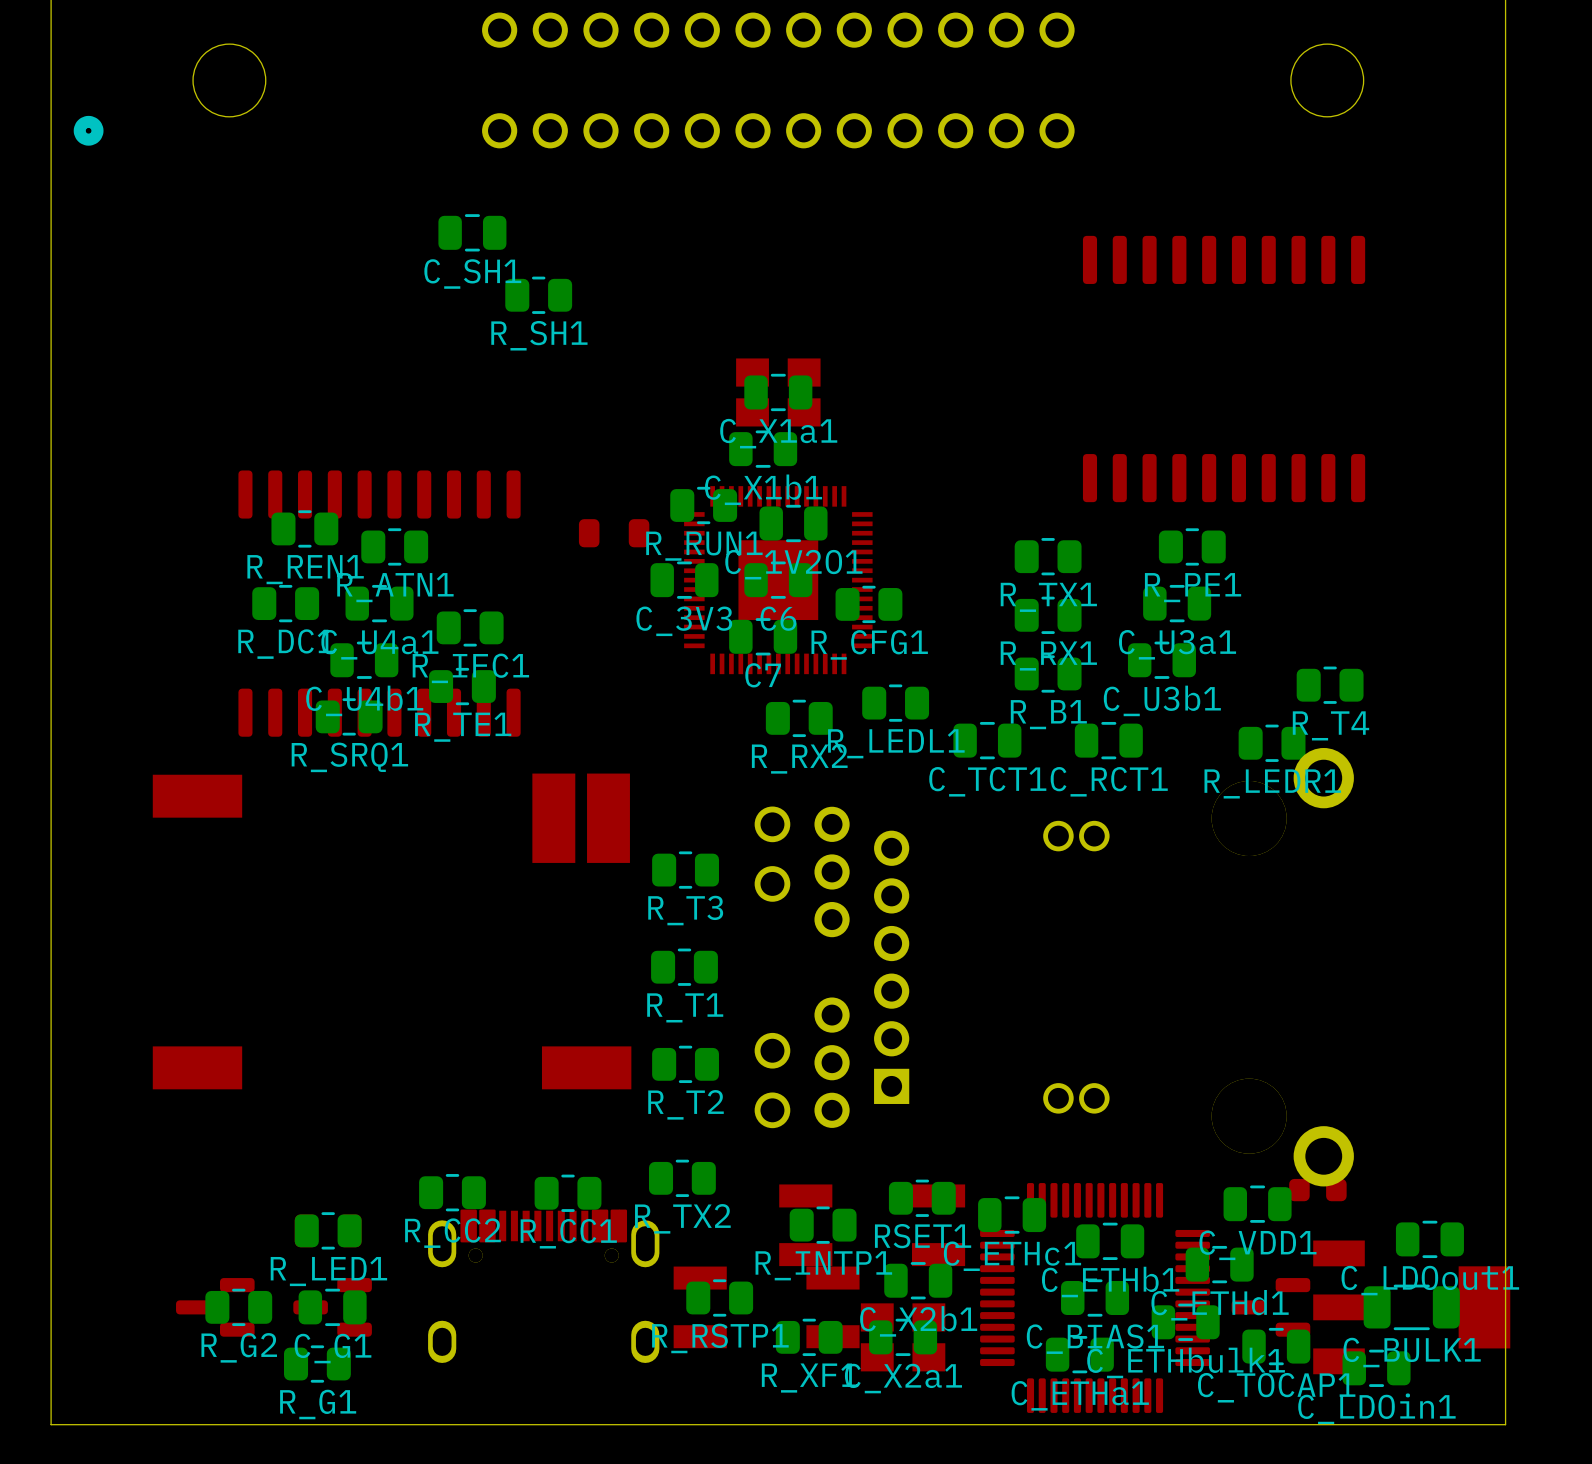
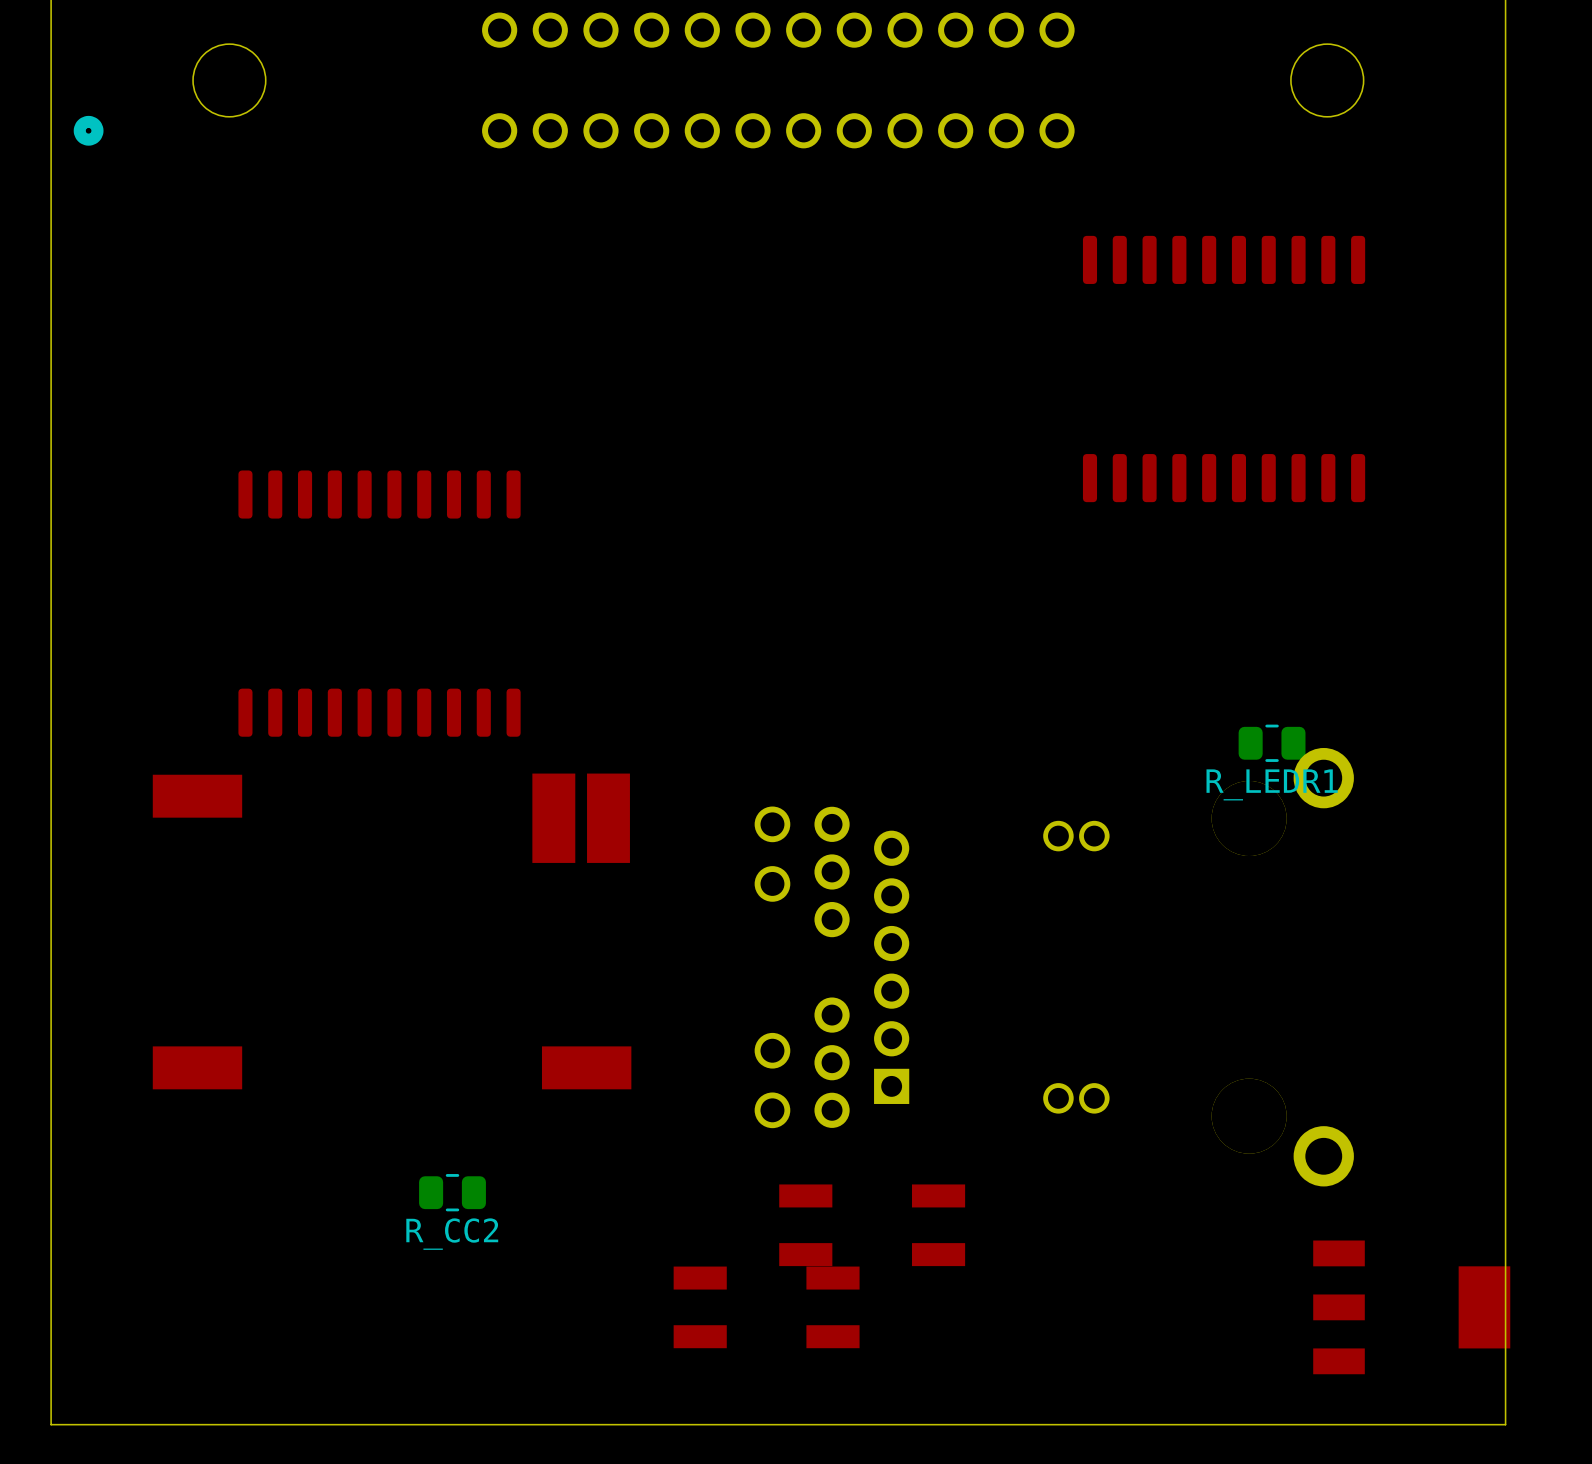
C_SH1: (472, 232) -> none
R_SH1: (538, 295) -> none
part: (778, 392) -> none
C_X1a1: (778, 392) -> none
C_X1b1: (763, 449) -> none
R_RUN1: (703, 505) -> none
C_1V2O1: (793, 523) -> none
R_REN1: (304, 528) -> none
part: (614, 533) -> none
R_ATN1: (394, 546) -> none
R_PE1: (1192, 546) -> none
R_TX1: (1048, 556) -> none
C_3V3: (684, 580) -> none
part: (778, 580) -> none
C6: (778, 580) -> none
R_DC1: (285, 603) -> none
C_U4a1: (379, 603) -> none
C_U3a1: (1177, 603) -> none
R_CFG1: (868, 604) -> none
R_RX1: (1048, 615) -> none
R_IFC1: (470, 627) -> none
C7: (763, 636) -> none
C_U4b1: (364, 660) -> none
C_U3b1: (1161, 660) -> none
R_B1: (1048, 673) -> none
R_T4: (1330, 685) -> none
R_TE1: (462, 686) -> none
R_LEDL1: (895, 703) -> none
R_SRQ1: (349, 716) -> none
R_RX2: (799, 718) -> none
C_TCT1: (987, 740) -> none
C_RCT1: (1108, 740) -> none
R_T3: (685, 870) -> none
R_T1: (684, 967) -> none
R_T2: (685, 1064) -> none
R_TX2: (682, 1178) -> none
part: (1317, 1190) -> none
R_CC1: (568, 1193) -> none
RSET1: (922, 1198) -> none
C_VDD1: (1257, 1204) -> none
C_ETHc1: (1012, 1215) -> none
R_INTP1: (823, 1225) -> none
R_LED1: (328, 1230) -> none
C_LDOout1: (1429, 1239) -> none
C_ETHb1: (1110, 1241) -> none
C_ETHd1: (1219, 1264) -> none
C_X2b1: (918, 1280) -> none
part: (543, 1286) -> none
R_RSTP1: (719, 1297) -> none
part: (1095, 1297) -> none
C_BIAS1: (1095, 1297) -> none
part: (215, 1307) -> none
R_G2: (238, 1307) -> none
part: (332, 1307) -> none
C_G1: (332, 1307) -> none
part: (1270, 1307) -> none
C_BULK1: (1411, 1307) -> none
C_ETHbulk1: (1185, 1322) -> none
R_XF1: (809, 1337) -> none
part: (903, 1337) -> none
C_X2a1: (903, 1337) -> none
C_TOCAP1: (1276, 1346) -> none
C_ETHa1: (1079, 1354) -> none
R_G1: (317, 1364) -> none
C_LDOin1: (1376, 1368) -> none

